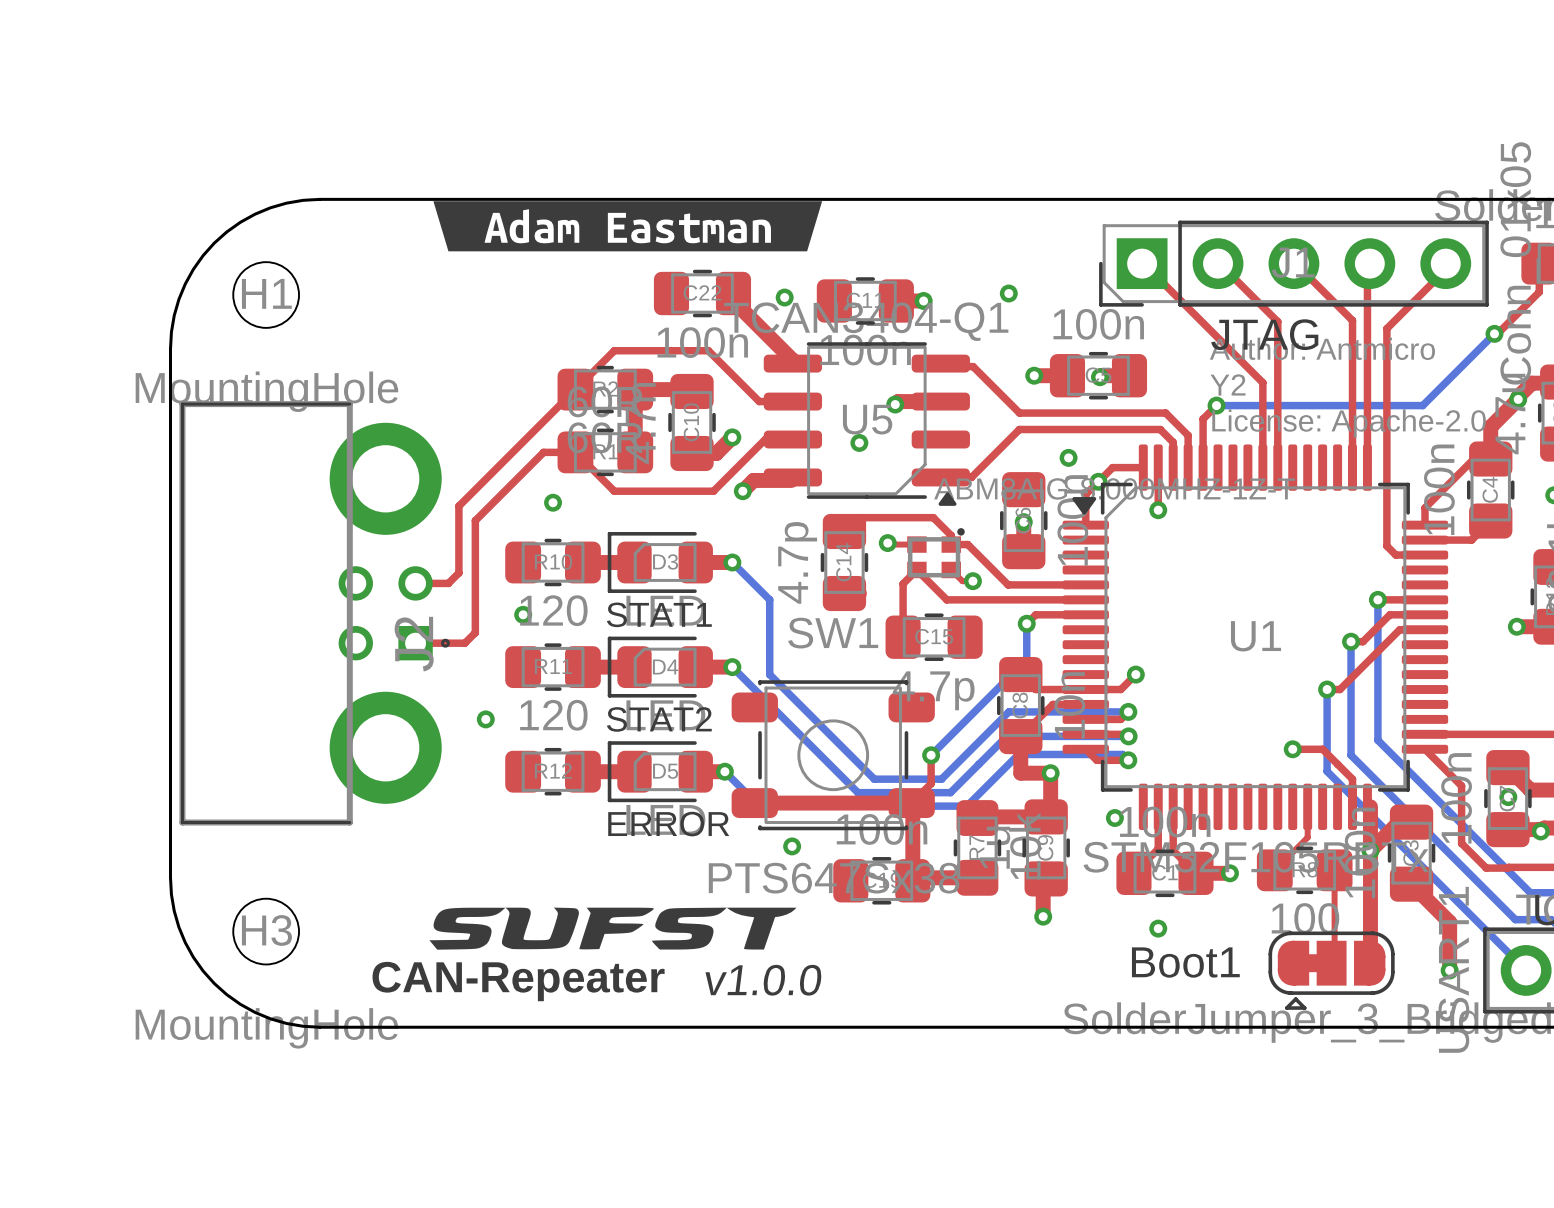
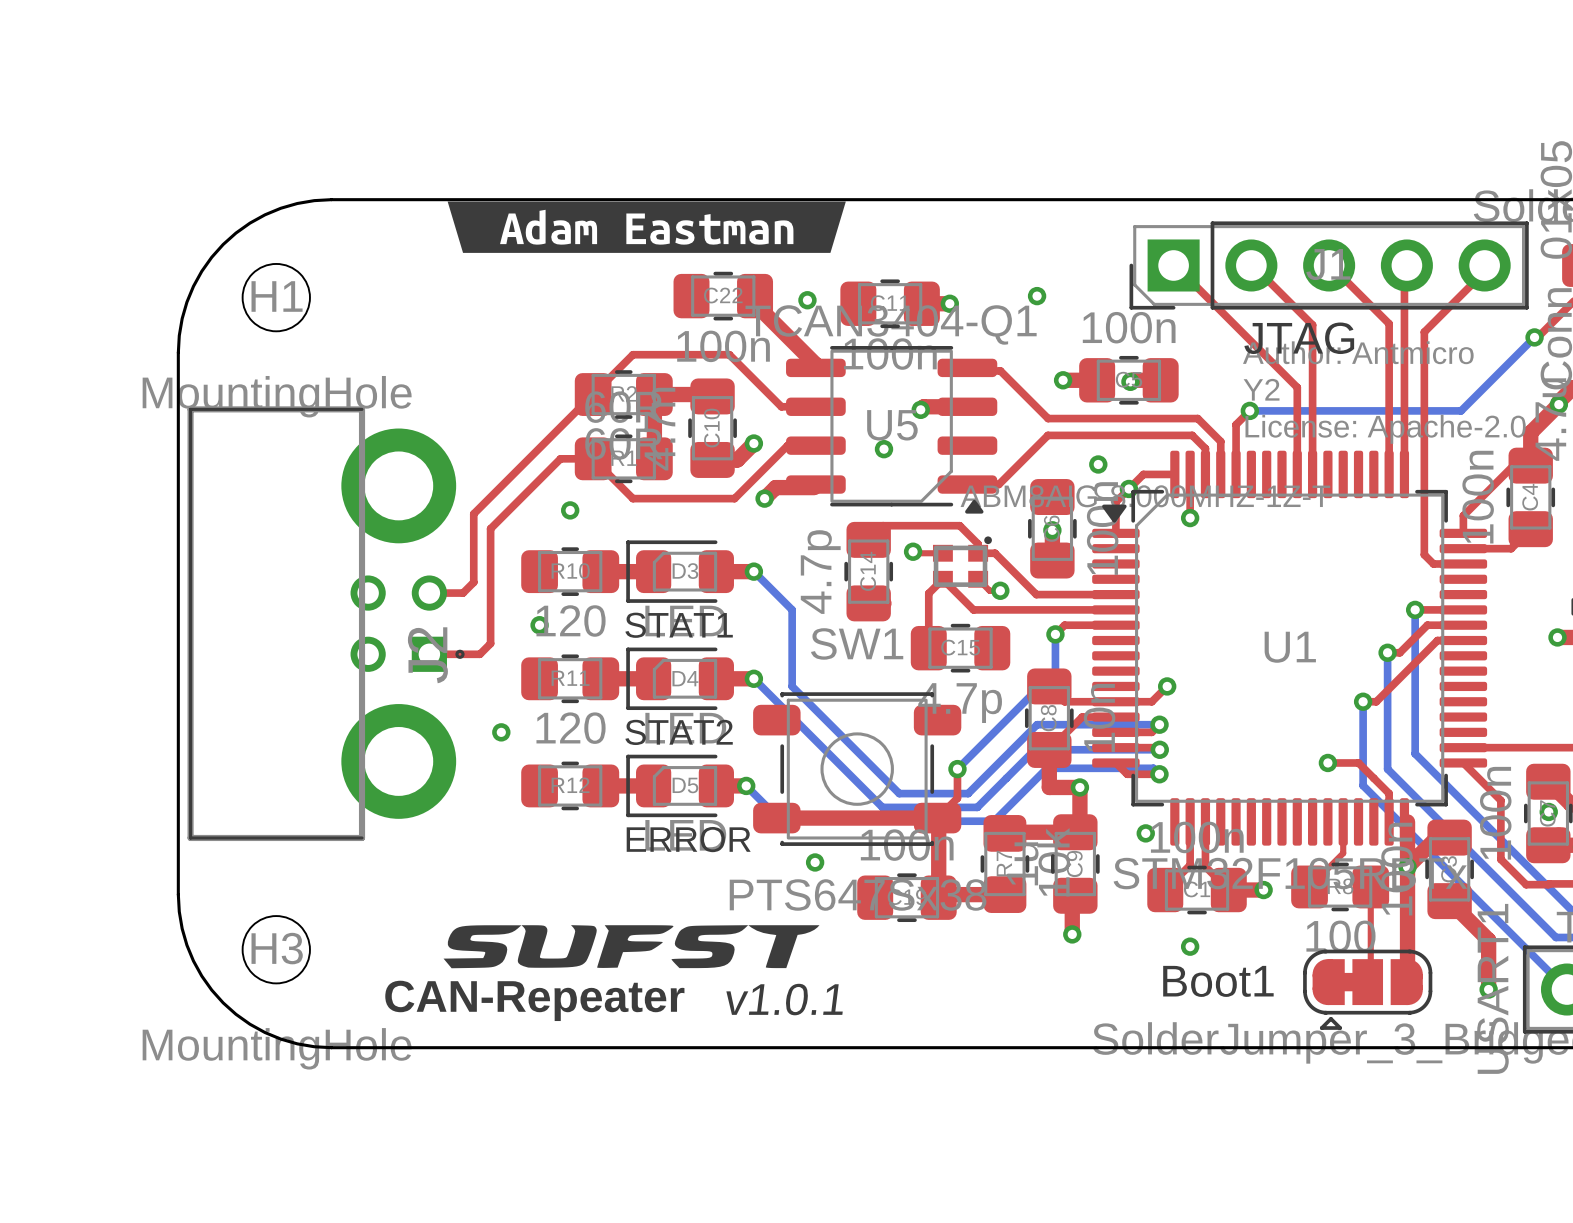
text: v1.0.0 (763, 980) -> v1.0.1 (784, 999)

